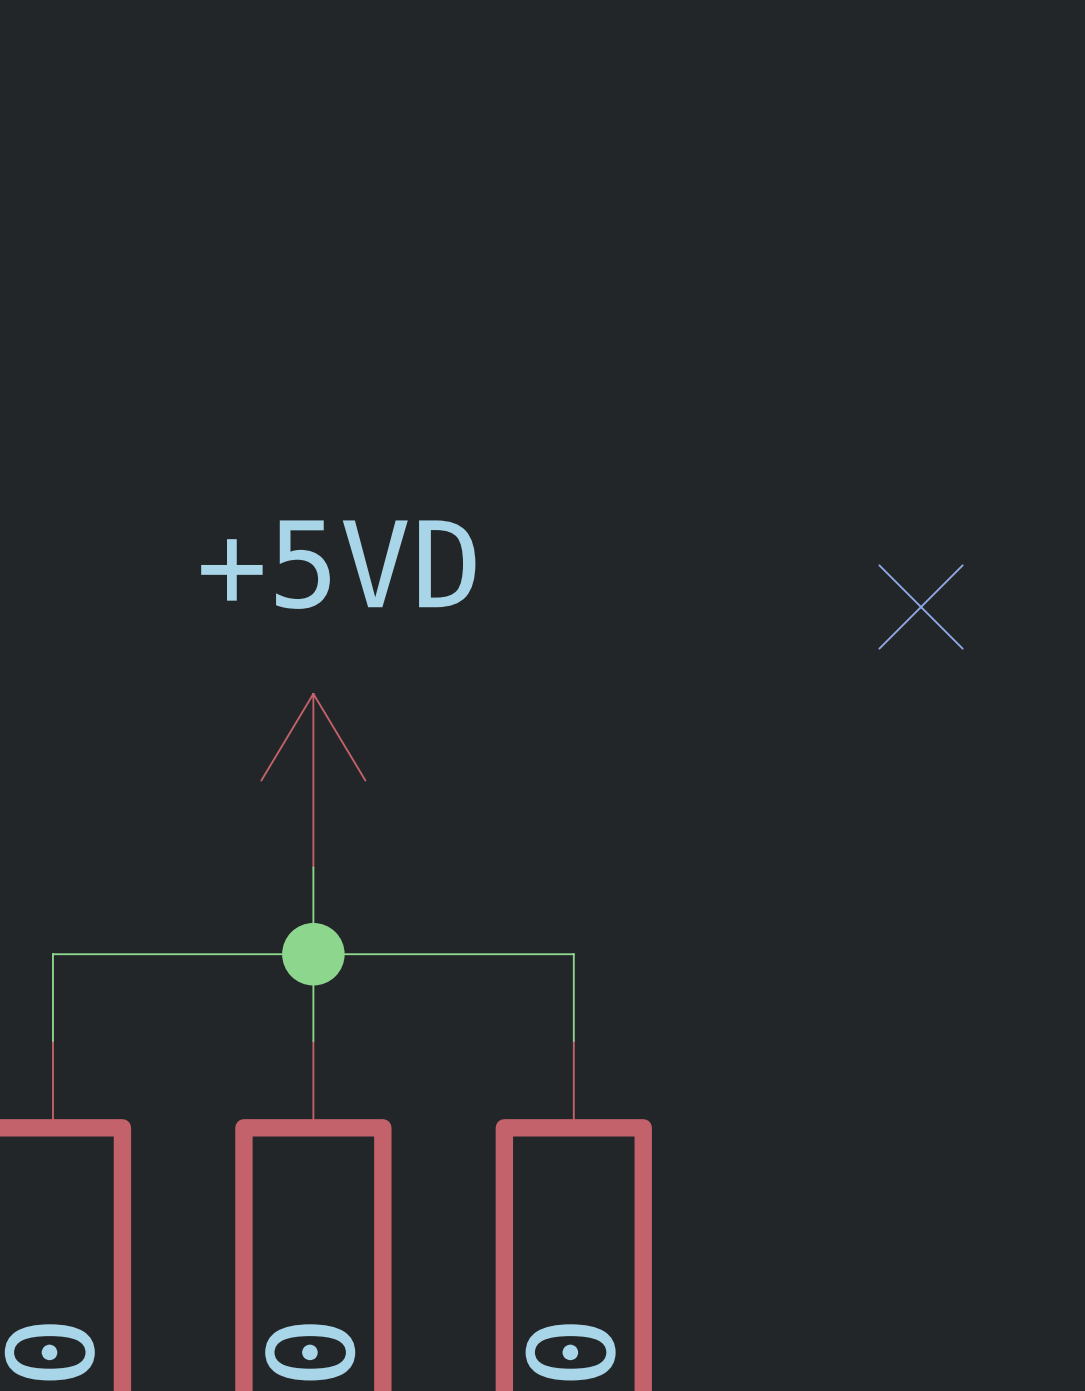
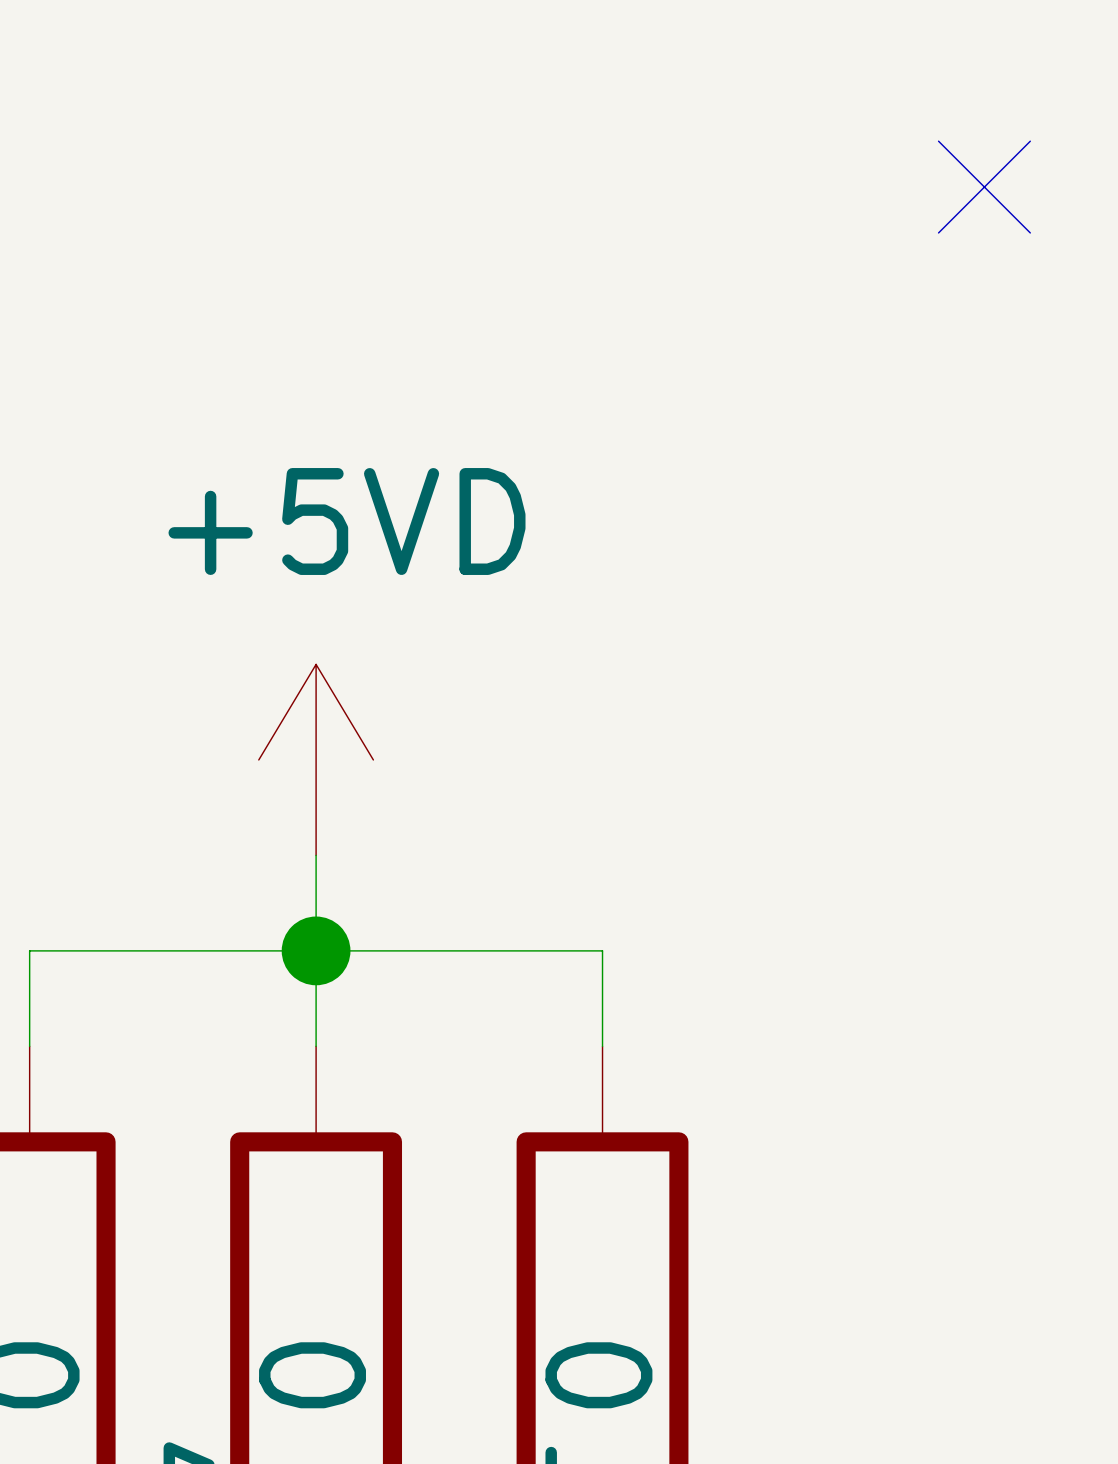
no-connect mark position: (921, 607) -> (984, 187)

